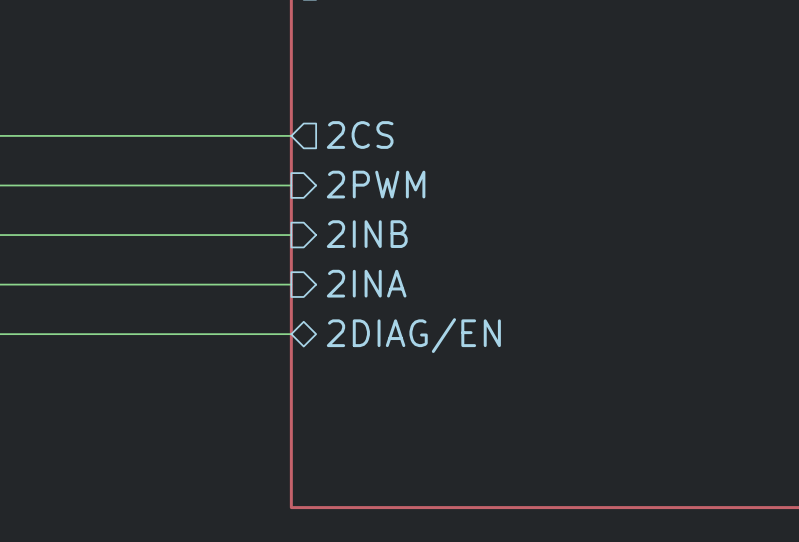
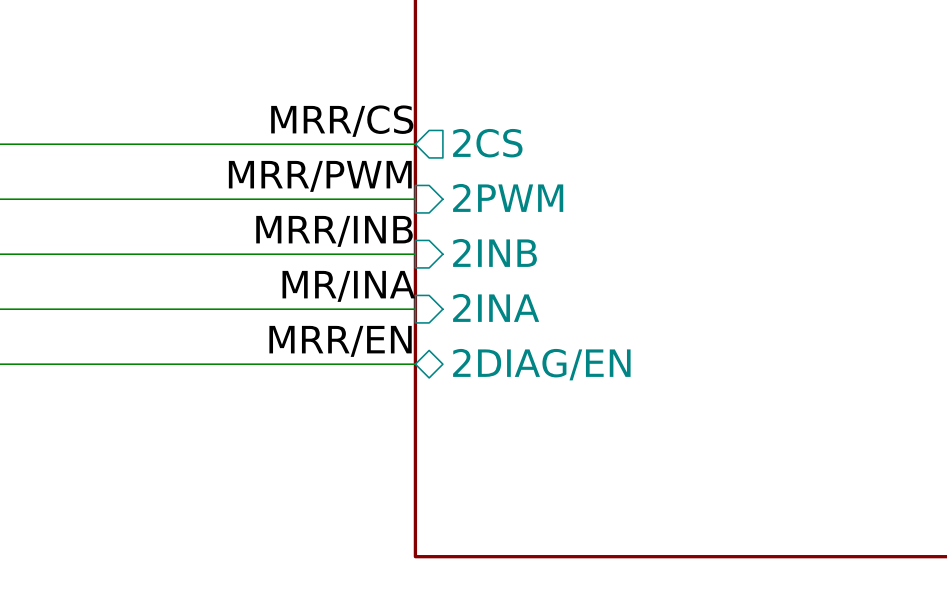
label: none -> MRR/CS (342, 121)
label: none -> MRR/PWM (320, 176)
label: none -> MRR/INB (334, 231)
label: none -> MR/INA (348, 286)
label: none -> MRR/EN (340, 341)

